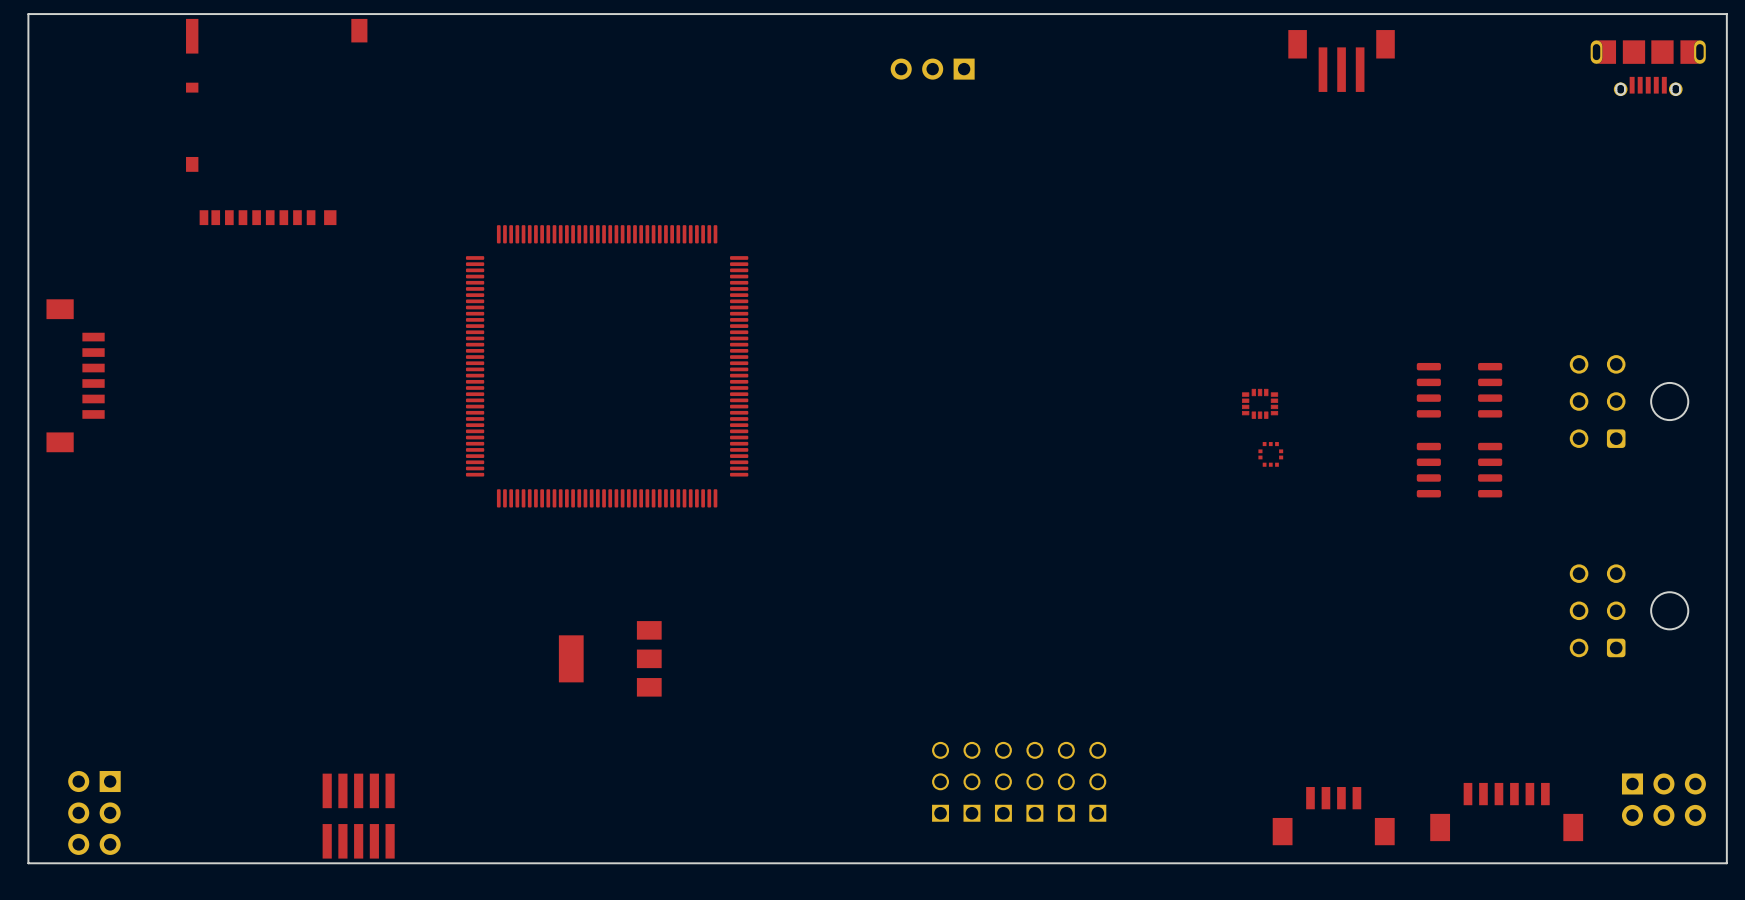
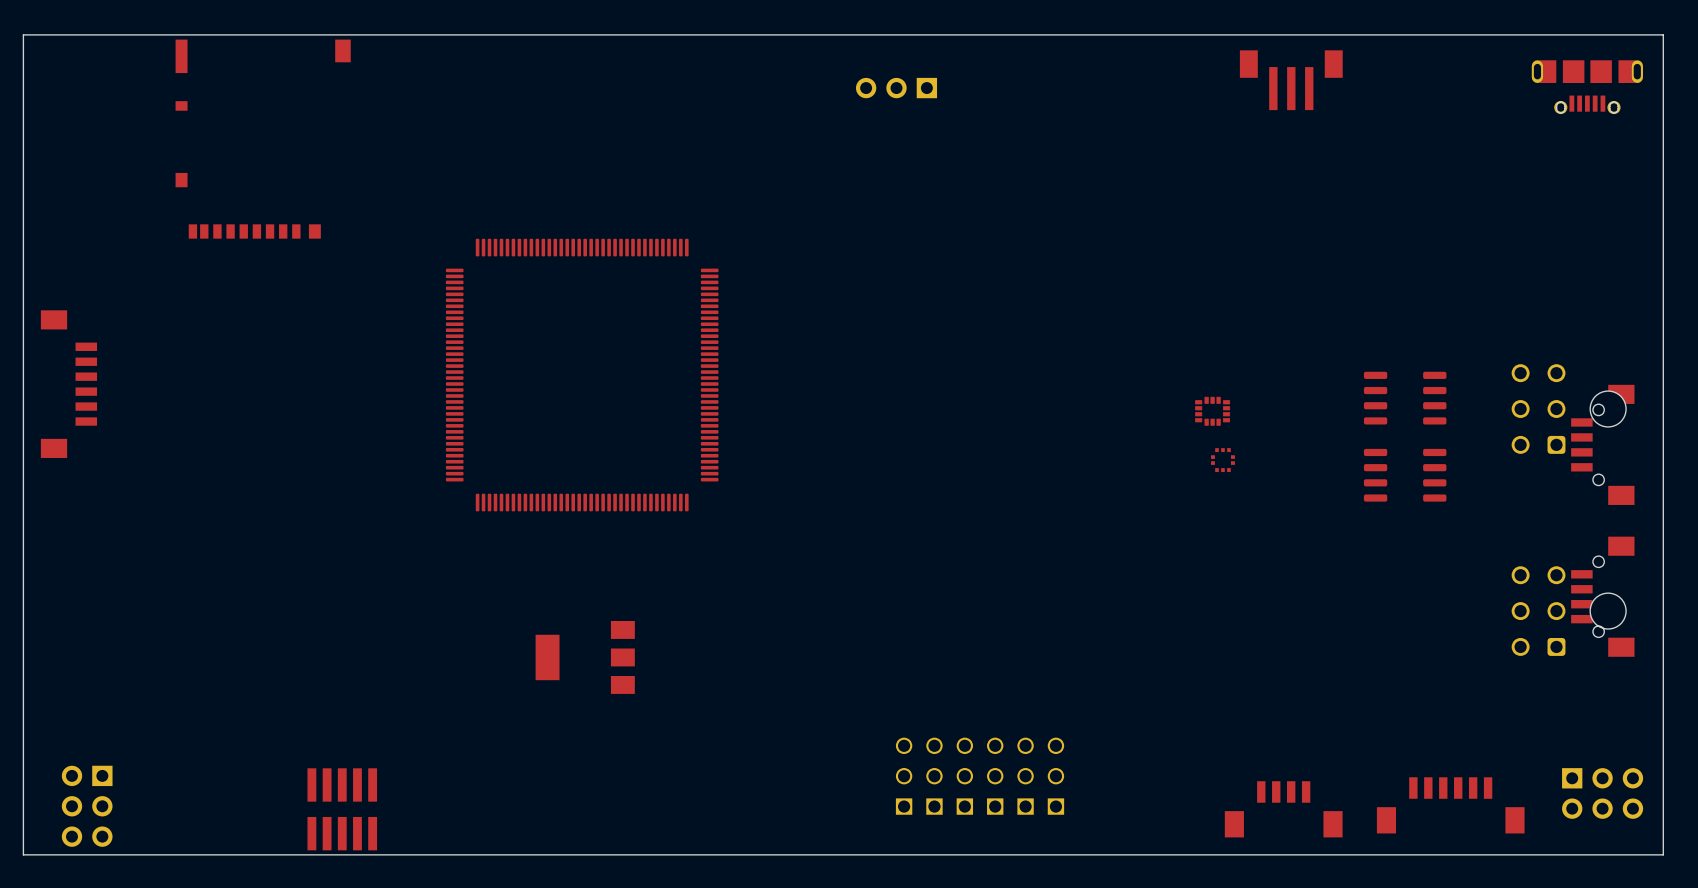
part: none -> (1602, 444)
part: none -> (1602, 596)

